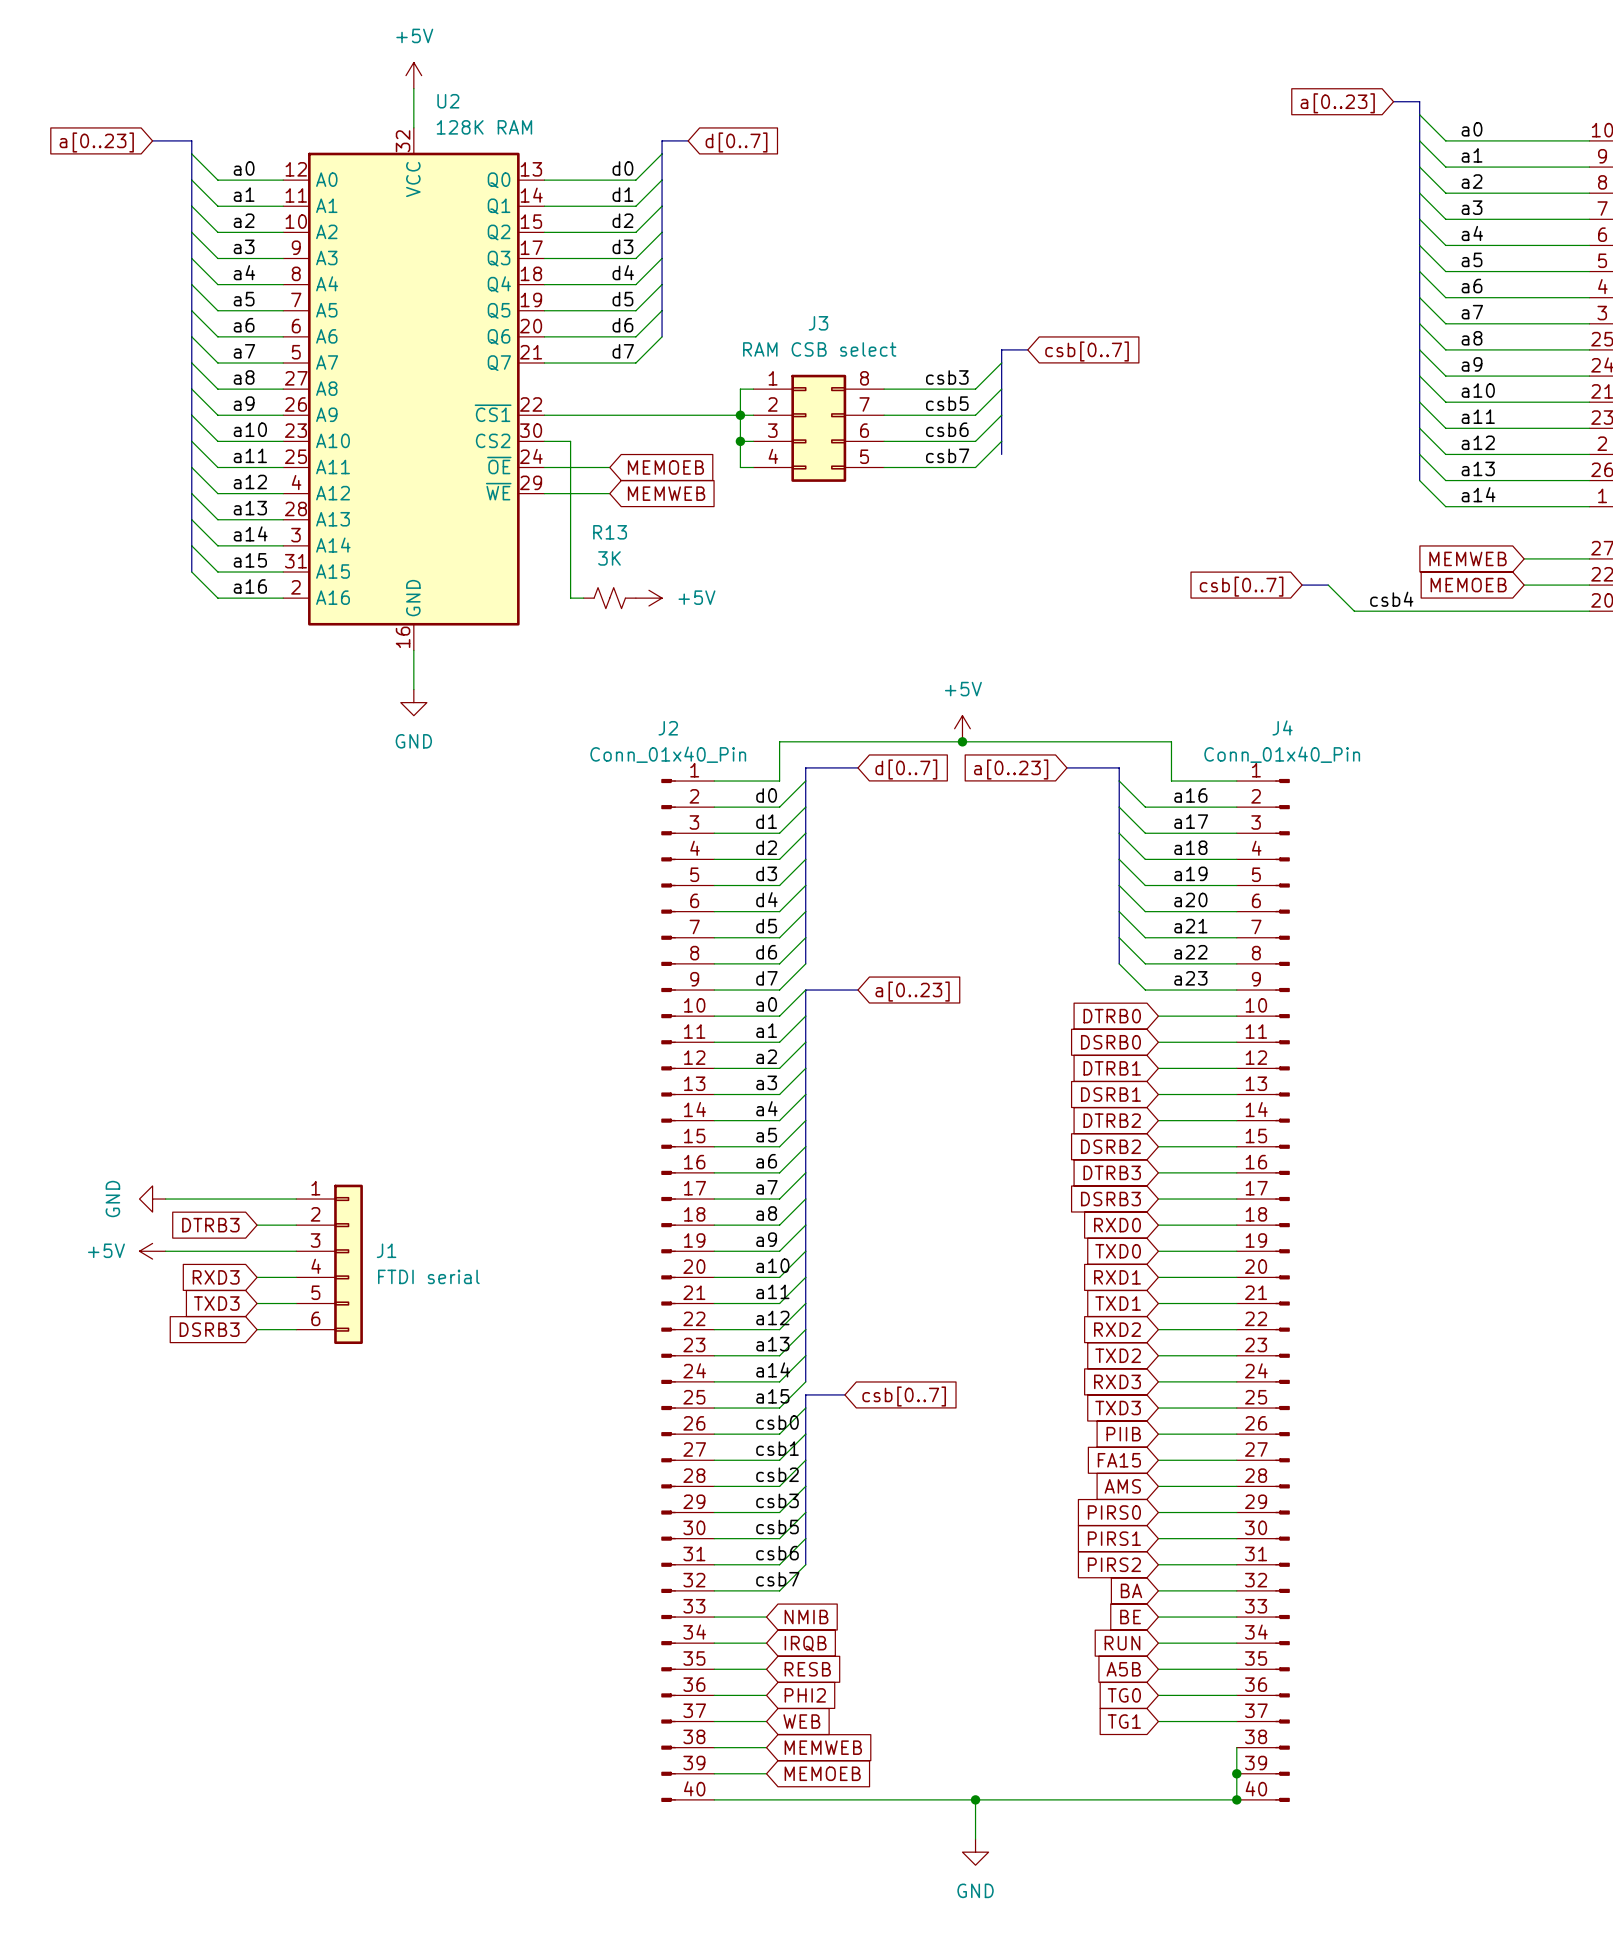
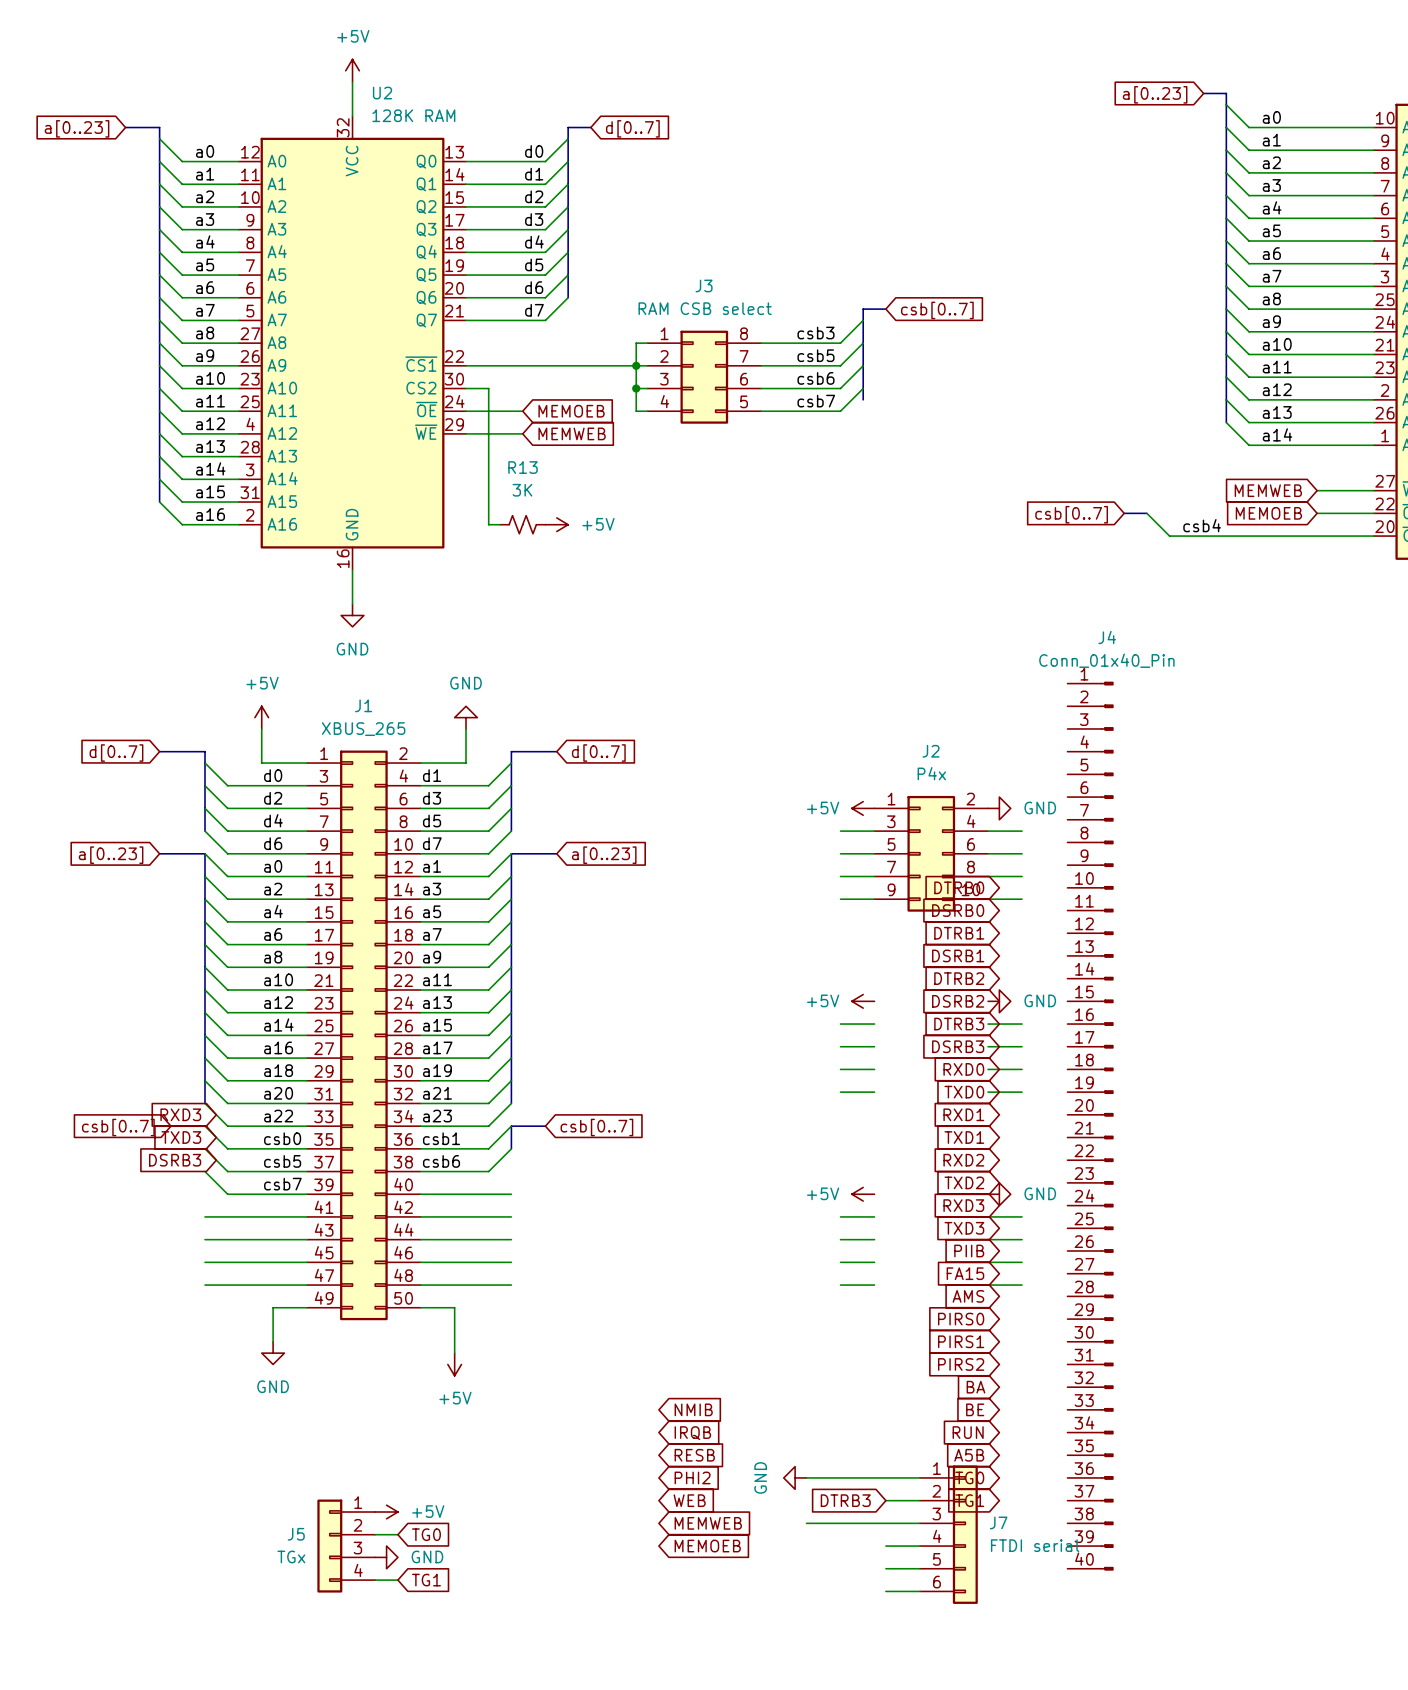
J2 name position: J2 (668, 728) -> J2 (931, 751)
power symbol rotation: 0° (962, 728) -> 90° counterclockwise (863, 808)
power symbol position: +5V (962, 728) -> +5V (863, 808)
junction: (962, 741) -> none
J2 value: Conn_01x40_Pin (668, 754) -> P4x (931, 773)
bus: (857, 767) (805, 767) (805, 963) -> none
bus: (1066, 767) (1119, 767) (1119, 963) -> none
global label position: d[0..7] (906, 769) -> d[0..7] (598, 753)
global label: a[0..23] (1011, 769) -> none
J2 symbol: [661, 778, 715, 1802] -> [874, 795, 989, 912]
wire: (714, 781) (779, 781) (779, 741) (1171, 741) (1171, 781) (1236, 781) -> none
wire: (805, 781) (779, 807) (714, 807) -> none
wire: (1119, 781) (1145, 807) (1236, 807) -> none
label: d0 (766, 795) -> none
label: a16 (1190, 795) -> none
wire: (805, 807) (779, 833) (714, 833) -> none
wire: (1119, 807) (1145, 833) (1236, 833) -> none
power symbol: none -> +5V (261, 717)
power symbol: none -> GND (466, 717)
label: d1 (766, 821) -> none
label: a17 (1191, 821) -> none
wire: none -> (261, 728) (261, 763) (307, 763)
wire: none -> (466, 728) (466, 763) (420, 763)
wire: (805, 833) (779, 859) (714, 859) -> none
wire: (1119, 833) (1145, 859) (1236, 859) -> none
label: d2 (766, 847) -> none
label: a18 (1190, 847) -> none
bus: none -> (159, 751) (205, 751) (205, 831)
bus: none -> (556, 751) (511, 751) (511, 831)
wire: (805, 859) (779, 885) (714, 885) -> none
wire: (1119, 859) (1145, 885) (1236, 885) -> none
global label: none -> d[0..7] (116, 753)
wire: none -> (205, 763) (227, 785) (307, 785)
wire: none -> (511, 763) (488, 785) (420, 785)
label: d3 (766, 873) -> none
label: a19 (1190, 873) -> none
wire: (805, 885) (779, 911) (714, 911) -> none
wire: (1119, 885) (1145, 911) (1236, 911) -> none
label: none -> d0 (273, 775)
label: none -> d1 (432, 775)
wire: none -> (205, 785) (227, 808) (307, 808)
wire: none -> (511, 785) (488, 808) (420, 808)
label: d4 (766, 899) -> none
label: a20 (1190, 899) -> none
wire: (805, 911) (779, 937) (714, 937) -> none
wire: (1119, 911) (1145, 937) (1236, 937) -> none
label: none -> d2 (273, 798)
label: none -> d3 (432, 798)
wire: none -> (205, 808) (227, 831) (307, 831)
wire: none -> (511, 808) (488, 831) (420, 831)
power symbol: none -> GND (999, 808)
label: d5 (766, 926) -> none
label: a21 (1190, 926) -> none
wire: (805, 937) (779, 963) (714, 963) -> none
wire: (1119, 937) (1145, 963) (1236, 963) -> none
label: none -> d4 (273, 820)
label: none -> d5 (432, 820)
wire: none -> (205, 831) (227, 853) (307, 853)
wire: none -> (511, 831) (488, 853) (420, 853)
wire: none -> (840, 831) (874, 831)
wire: none -> (988, 831) (1022, 831)
label: d6 (766, 952) -> none
label: a22 (1190, 952) -> none
wire: (805, 963) (779, 990) (714, 990) -> none
wire: (1119, 963) (1145, 990) (1236, 990) -> none
label: none -> d6 (273, 843)
label: none -> d7 (432, 843)
bus: none -> (159, 853) (205, 853) (205, 1103)
wire: none -> (205, 853) (227, 876) (307, 876)
wire: none -> (511, 853) (488, 876) (420, 876)
bus: none -> (556, 853) (511, 853) (511, 1103)
wire: none -> (840, 853) (874, 853)
wire: none -> (988, 853) (1022, 853)
global label: none -> a[0..23] (111, 855)
label: d7 (766, 978) -> none
label: a23 (1190, 978) -> none
wire: (805, 990) (779, 1016) (714, 1016) -> none
bus: (857, 990) (805, 990) (805, 1381) -> none
label: none -> a0 (273, 866)
label: none -> a1 (432, 866)
global label position: a[0..23] (912, 991) -> a[0..23] (604, 855)
wire: none -> (205, 876) (227, 899) (307, 899)
wire: none -> (511, 876) (488, 899) (420, 899)
wire: none -> (840, 876) (874, 876)
wire: none -> (988, 876) (1022, 876)
label: a0 (766, 1004) -> none
wire: (805, 1016) (779, 1042) (714, 1042) -> none
wire: (1158, 1016) (1236, 1016) -> none
label: none -> a2 (273, 889)
label: none -> a3 (432, 889)
wire: none -> (205, 899) (227, 921) (307, 921)
wire: none -> (511, 899) (488, 921) (420, 921)
wire: none -> (840, 899) (874, 899)
wire: none -> (988, 899) (1022, 899)
label: a1 (766, 1030) -> none
wire: (805, 1042) (779, 1068) (714, 1068) -> none
wire: (1158, 1042) (1236, 1042) -> none
label: none -> a4 (273, 911)
label: none -> a5 (432, 911)
wire: none -> (205, 921) (227, 944) (307, 944)
wire: none -> (511, 921) (488, 944) (420, 944)
label: a2 (766, 1056) -> none
wire: (805, 1068) (779, 1094) (714, 1094) -> none
wire: (1158, 1068) (1236, 1068) -> none
label: none -> a6 (273, 934)
label: none -> a7 (432, 934)
wire: none -> (205, 944) (227, 967) (307, 967)
wire: none -> (511, 944) (488, 967) (420, 967)
label: a3 (766, 1082) -> none
wire: (805, 1094) (779, 1120) (714, 1120) -> none
wire: (1158, 1094) (1236, 1094) -> none
label: none -> a8 (273, 957)
label: none -> a9 (432, 957)
wire: none -> (205, 967) (227, 989) (307, 989)
wire: none -> (511, 967) (488, 989) (420, 989)
label: a4 (766, 1108) -> none
wire: (805, 1120) (779, 1146) (714, 1146) -> none
wire: (1158, 1120) (1236, 1120) -> none
label: none -> a10 (278, 979)
label: none -> a11 (437, 979)
wire: none -> (205, 989) (227, 1012) (307, 1012)
wire: none -> (511, 989) (488, 1012) (420, 1012)
label: a5 (766, 1135) -> none
wire: (805, 1146) (779, 1172) (714, 1172) -> none
power symbol: none -> +5V (863, 1001)
wire: (1158, 1146) (1236, 1146) -> none
power symbol: none -> GND (999, 1001)
label: none -> a12 (278, 1002)
label: none -> a13 (437, 1002)
wire: none -> (205, 1012) (227, 1035) (307, 1035)
wire: none -> (511, 1012) (488, 1035) (420, 1035)
label: a6 (766, 1161) -> none
wire: (805, 1172) (779, 1199) (714, 1199) -> none
wire: none -> (840, 1024) (874, 1024)
wire: none -> (988, 1024) (999, 1024)
wire: (1184, 1172) (1236, 1172) -> none
label: none -> a14 (278, 1024)
label: none -> a15 (437, 1025)
J1 symbol: [296, 1184, 363, 1345] -> [307, 750, 421, 1321]
wire: none -> (205, 1035) (227, 1058) (307, 1058)
wire: none -> (511, 1035) (488, 1058) (420, 1058)
label: a7 (766, 1187) -> none
power symbol: GND (152, 1199) -> none
wire: (165, 1199) (296, 1199) -> none
wire: (805, 1199) (779, 1225) (714, 1225) -> none
wire: none -> (840, 1046) (874, 1046)
wire: none -> (988, 1046) (999, 1046)
wire: (1184, 1199) (1236, 1199) -> none
label: none -> a16 (278, 1047)
label: none -> a17 (437, 1047)
wire: none -> (205, 1058) (227, 1080) (307, 1080)
wire: none -> (511, 1058) (488, 1080) (420, 1080)
label: a8 (766, 1213) -> none
global label: DTRB3 (210, 1225) -> none
wire: (257, 1225) (296, 1225) -> none
wire: (805, 1225) (779, 1251) (714, 1251) -> none
wire: none -> (840, 1069) (874, 1069)
wire: none -> (988, 1069) (999, 1069)
wire: (1184, 1225) (1236, 1225) -> none
label: none -> a18 (278, 1070)
label: none -> a19 (437, 1070)
wire: none -> (205, 1080) (227, 1103) (307, 1103)
wire: none -> (511, 1080) (488, 1103) (420, 1103)
label: a9 (766, 1239) -> none
J1 name position: J1 (386, 1250) -> J1 (363, 705)
power symbol: +5V (152, 1251) -> none
wire: (165, 1251) (296, 1251) -> none
wire: (805, 1251) (779, 1277) (714, 1277) -> none
wire: none -> (840, 1092) (874, 1092)
wire: none -> (988, 1092) (999, 1092)
wire: (1184, 1251) (1236, 1251) -> none
label: none -> a20 (278, 1093)
label: none -> a21 (437, 1093)
wire: none -> (205, 1103) (227, 1126) (307, 1126)
wire: none -> (511, 1103) (488, 1126) (420, 1126)
label: a10 (772, 1265) -> none
J1 value: FTDI serial (428, 1276) -> XBUS_265 (363, 729)
wire: (257, 1277) (296, 1277) -> none
wire: (805, 1277) (779, 1303) (714, 1303) -> none
wire: (1158, 1277) (1236, 1277) -> none
label: none -> a22 (278, 1116)
label: none -> a23 (437, 1116)
wire: none -> (205, 1126) (227, 1148) (307, 1148)
wire: none -> (511, 1126) (488, 1148) (420, 1148)
bus: none -> (545, 1126) (511, 1126) (511, 1148)
label: a11 (772, 1291) -> none
global label: none -> csb[0..7] (118, 1127)
wire: (257, 1303) (296, 1303) -> none
wire: (805, 1303) (779, 1329) (714, 1329) -> none
wire: (1158, 1303) (1236, 1303) -> none
label: none -> csb0 (282, 1138)
label: none -> csb1 (441, 1138)
wire: none -> (205, 1148) (227, 1171) (307, 1171)
wire: none -> (511, 1148) (488, 1171) (420, 1171)
label: a12 (772, 1317) -> none
wire: (257, 1329) (296, 1329) -> none
wire: (805, 1329) (779, 1355) (714, 1355) -> none
wire: (1158, 1329) (1236, 1329) -> none
label: none -> csb5 (282, 1161)
label: none -> csb6 (441, 1161)
wire: none -> (205, 1171) (227, 1194) (307, 1194)
label: a13 (772, 1344) -> none
wire: (805, 1355) (779, 1381) (714, 1381) -> none
wire: (1158, 1355) (1236, 1355) -> none
label: none -> csb7 (282, 1184)
wire: none -> (420, 1194) (511, 1194)
power symbol: none -> +5V (863, 1194)
power symbol: none -> GND (999, 1194)
label: a14 (773, 1369) -> none
wire: (805, 1381) (779, 1408) (714, 1408) -> none
wire: (1158, 1381) (1236, 1381) -> none
wire: none -> (205, 1216) (307, 1216)
wire: none -> (420, 1216) (511, 1216)
bus: (844, 1394) (805, 1394) (805, 1564) -> none
wire: none -> (840, 1216) (874, 1216)
wire: none -> (988, 1216) (1022, 1216)
label: a15 (772, 1396) -> none
global label position: csb[0..7] (904, 1396) -> csb[0..7] (596, 1127)
wire: (805, 1408) (779, 1434) (714, 1434) -> none
wire: (1158, 1408) (1236, 1408) -> none
wire: none -> (205, 1239) (307, 1239)
wire: none -> (420, 1239) (511, 1239)
wire: none -> (840, 1239) (874, 1239)
wire: none -> (988, 1239) (1022, 1239)
label: csb0 (777, 1422) -> none
wire: (805, 1434) (779, 1460) (714, 1460) -> none
wire: (1158, 1434) (1236, 1434) -> none
wire: none -> (205, 1262) (307, 1262)
wire: none -> (420, 1262) (511, 1262)
wire: none -> (840, 1262) (874, 1262)
wire: none -> (988, 1262) (1022, 1262)
label: csb1 (777, 1448) -> none
wire: (805, 1460) (779, 1486) (714, 1486) -> none
wire: (1158, 1460) (1236, 1460) -> none
wire: none -> (205, 1285) (307, 1285)
wire: none -> (420, 1285) (511, 1285)
wire: none -> (840, 1285) (874, 1285)
wire: none -> (988, 1285) (1022, 1285)
label: csb2 (777, 1474) -> none
wire: (805, 1486) (779, 1512) (714, 1512) -> none
wire: (1158, 1486) (1236, 1486) -> none
wire: none -> (307, 1307) (273, 1307) (273, 1341)
wire: none -> (420, 1307) (454, 1307) (454, 1353)
label: csb3 (777, 1500) -> none
wire: (805, 1512) (779, 1538) (714, 1538) -> none
wire: (1158, 1512) (1236, 1512) -> none
label: csb5 (777, 1526) -> none
wire: (805, 1538) (779, 1564) (714, 1564) -> none
wire: (1158, 1538) (1236, 1538) -> none
power symbol: none -> GND (273, 1353)
label: csb6 (777, 1553) -> none
power symbol: none -> +5V (454, 1364)
wire: (805, 1564) (779, 1590) (714, 1590) -> none
wire: (1158, 1564) (1236, 1564) -> none
label: csb7 (777, 1579) -> none
wire: (1158, 1590) (1236, 1590) -> none
wire: (714, 1617) (766, 1617) -> none
wire: (1158, 1617) (1236, 1617) -> none
wire: (714, 1643) (766, 1643) -> none
wire: (1158, 1643) (1236, 1643) -> none
wire: (714, 1669) (766, 1669) -> none
wire: (1158, 1669) (1236, 1669) -> none
wire: (714, 1695) (766, 1695) -> none
wire: none -> (806, 1477) (919, 1477)
wire: (1158, 1695) (1236, 1695) -> none
wire: (714, 1721) (766, 1721) -> none
global label: none -> DTRB3 (845, 1500)
wire: none -> (885, 1500) (919, 1500)
wire: (1158, 1721) (1236, 1721) -> none
power symbol: none -> +5V (386, 1512)
wire: (714, 1747) (766, 1747) -> none
wire: none -> (806, 1523) (919, 1523)
wire: (1236, 1747) (1236, 1799) (1066, 1799) -> none
wire: none -> (375, 1534) (397, 1534)
global label: none -> TG0 (426, 1534)
J7: none -> FTDI serial (948, 1534)
J5: none -> TGx (346, 1546)
wire: (714, 1773) (766, 1773) -> none
wire: none -> (885, 1546) (919, 1546)
junction: (1236, 1773) -> none
power symbol: none -> GND (386, 1557)
wire: (714, 1799) (1027, 1799) -> none
wire: (975, 1799) (975, 1839) -> none
junction: (975, 1799) -> none
junction: (1236, 1799) -> none
wire: none -> (375, 1580) (397, 1580)
global label: none -> TG1 (426, 1580)
wire: none -> (885, 1591) (919, 1591)
power symbol rotation: 0° (975, 1852) -> 90° clockwise (795, 1477)
power symbol position: GND (975, 1852) -> GND (795, 1477)

